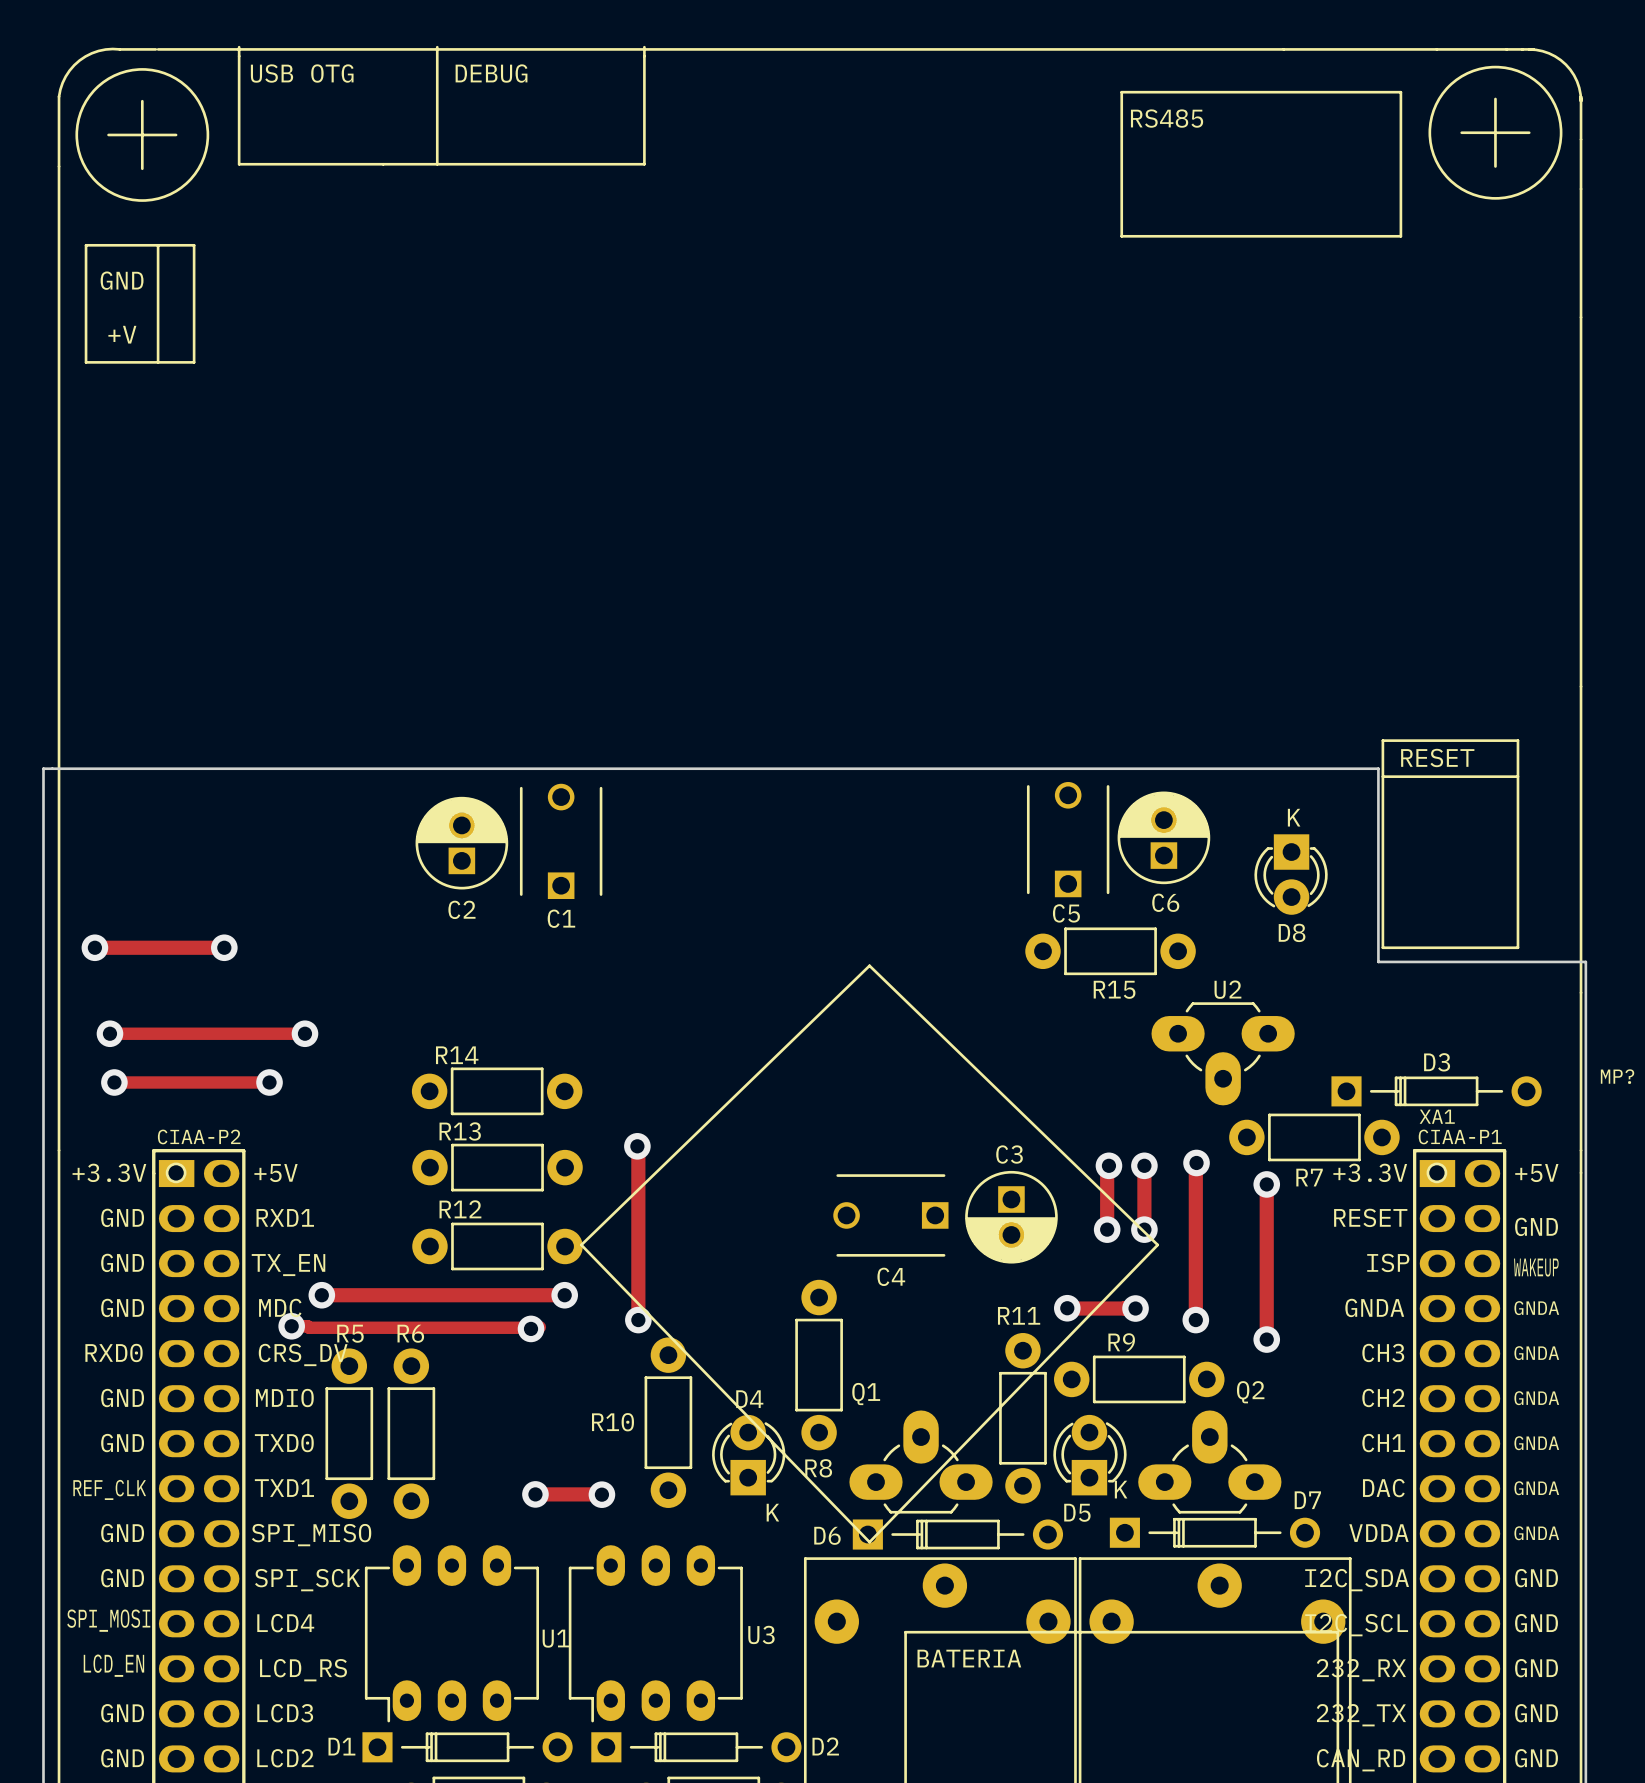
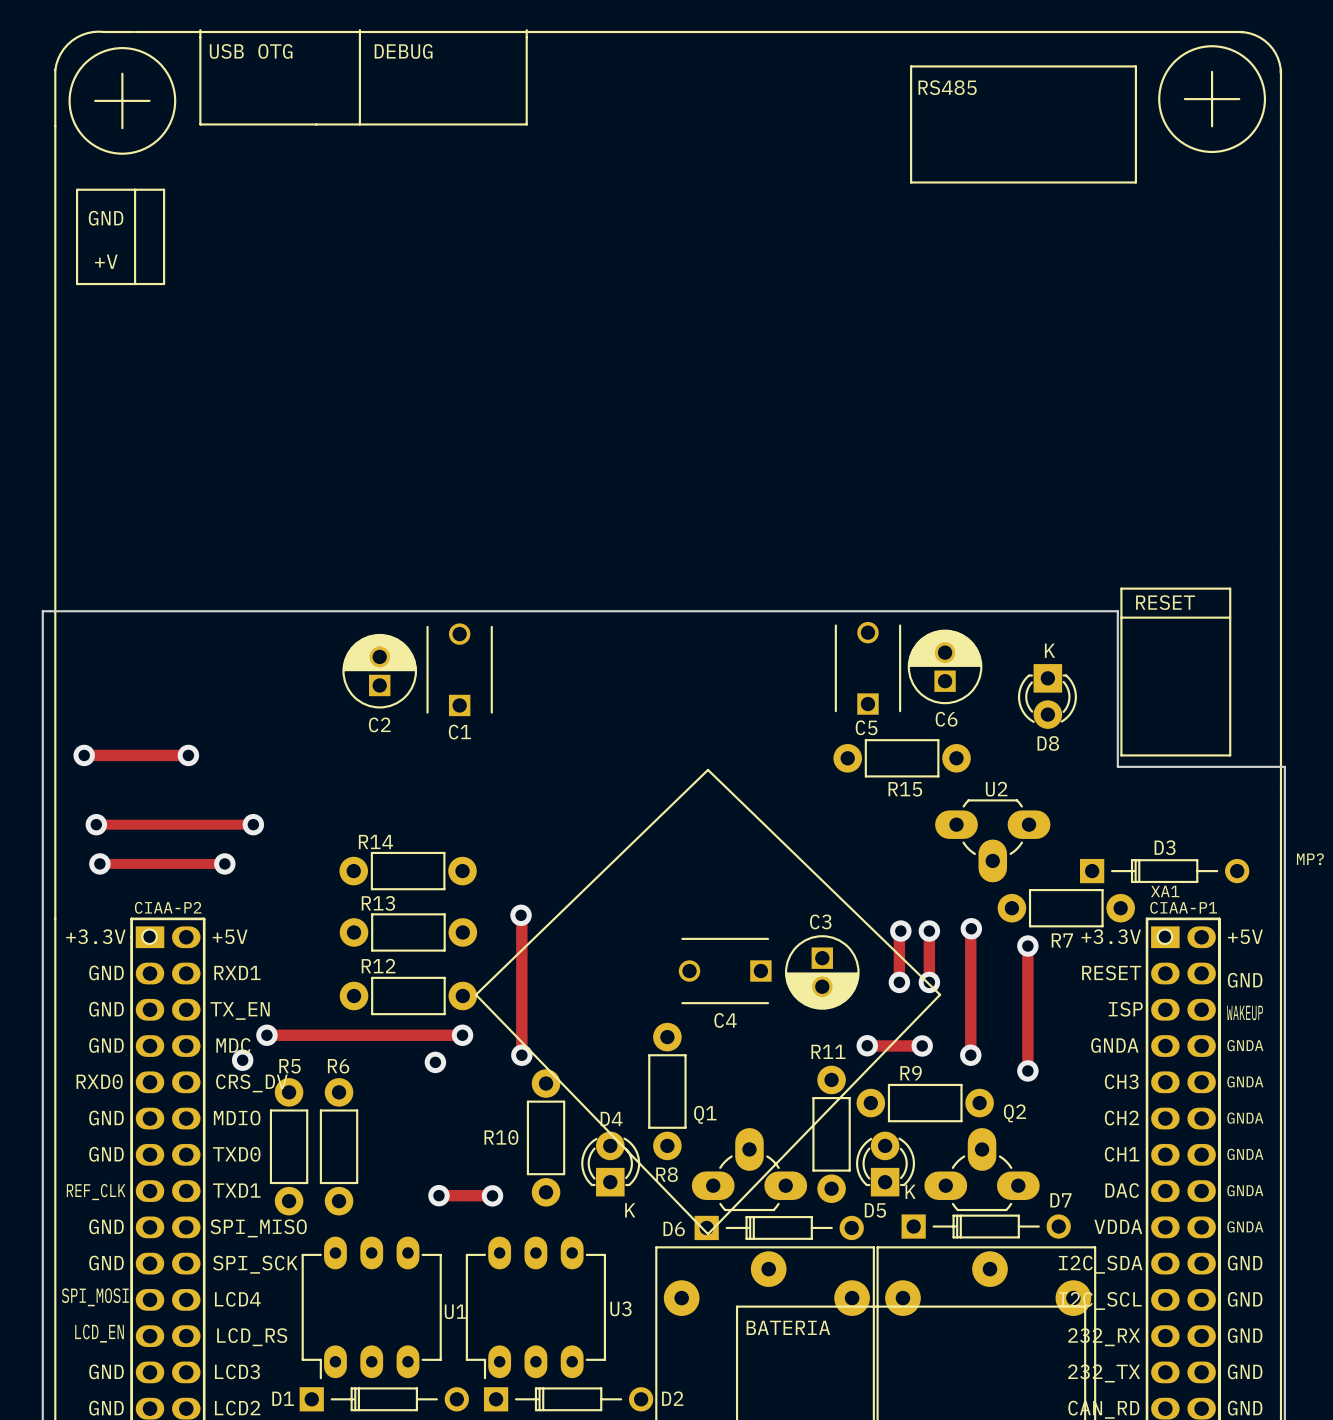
track: (291, 1326) (539, 1327) -> none

